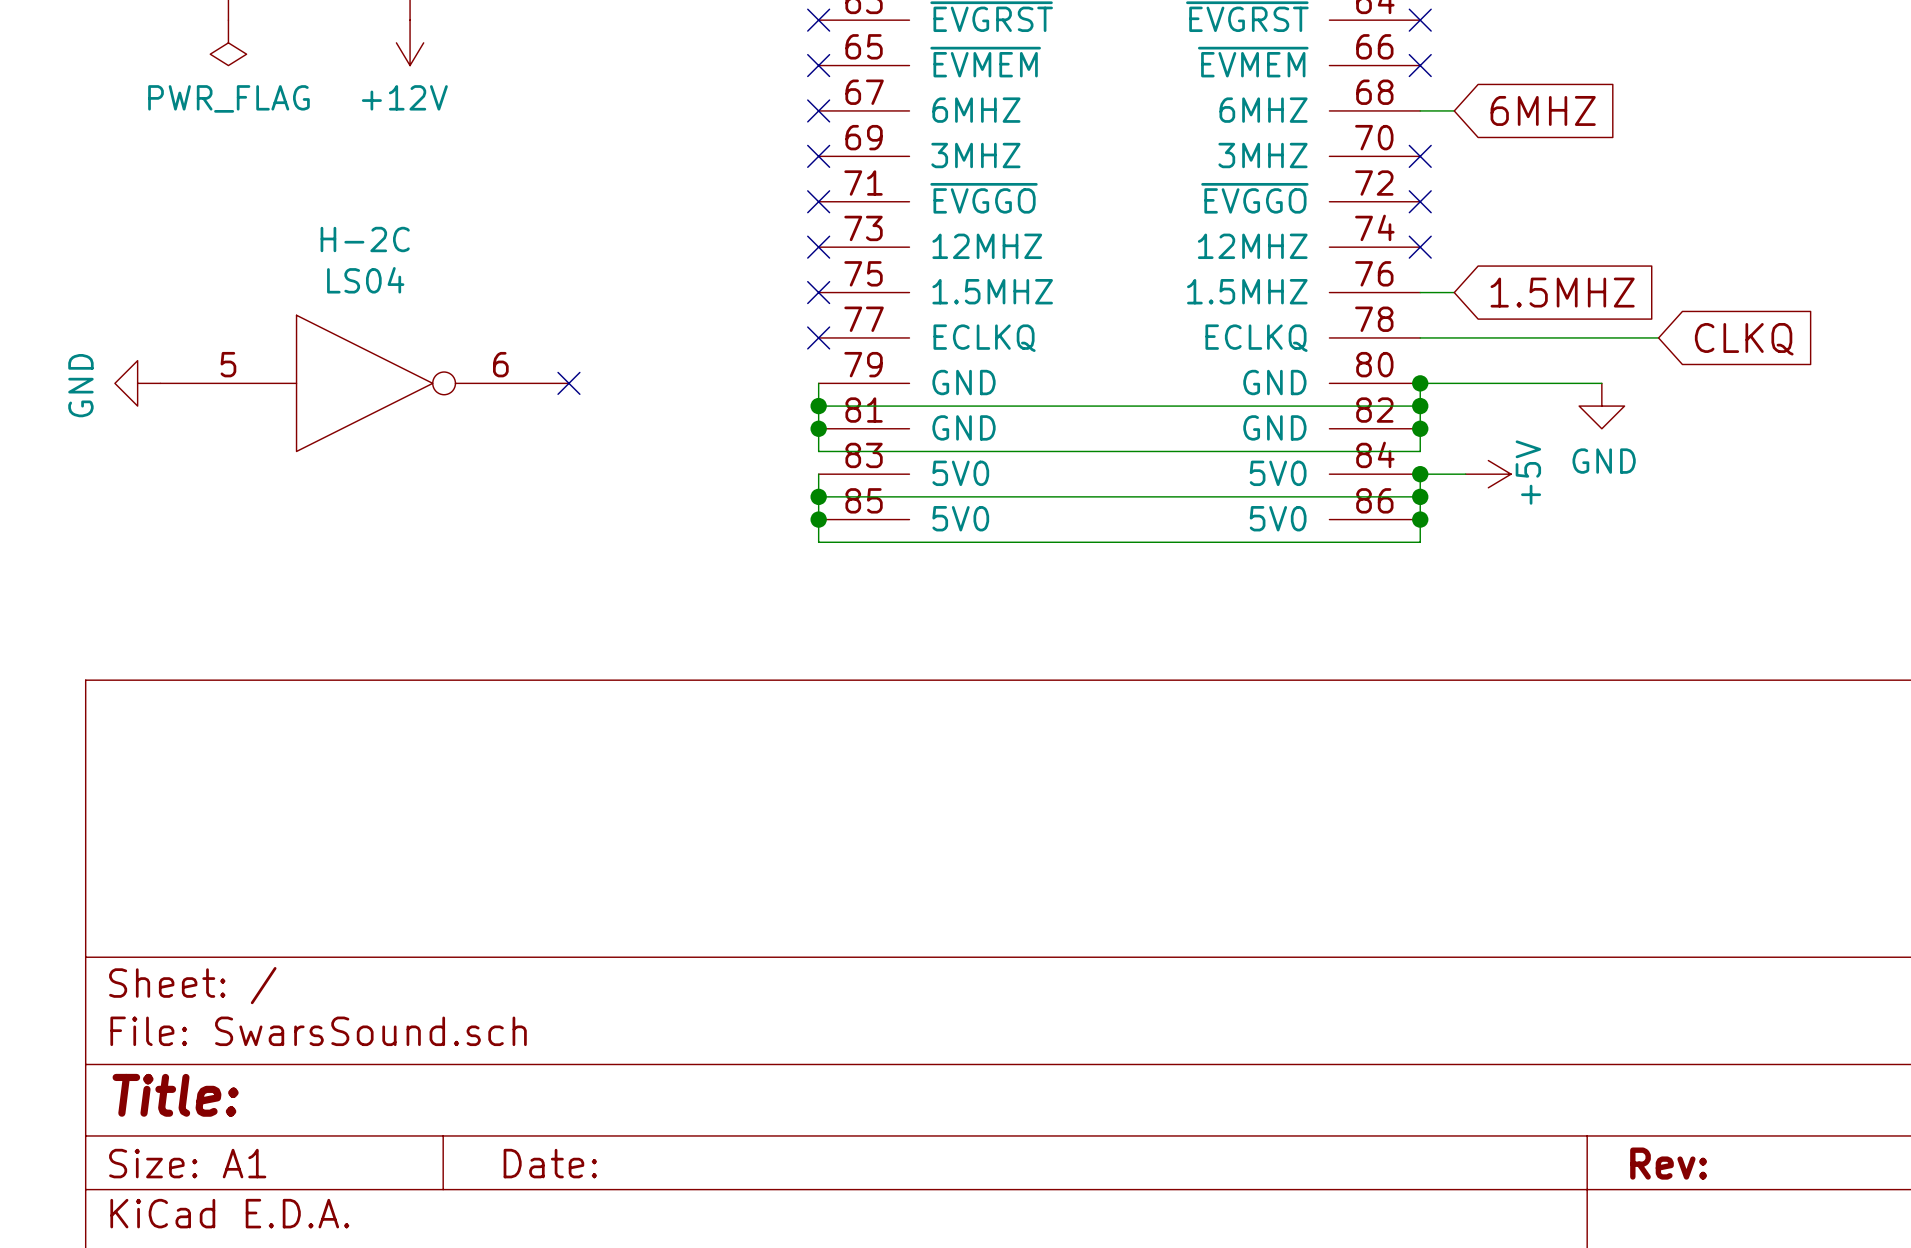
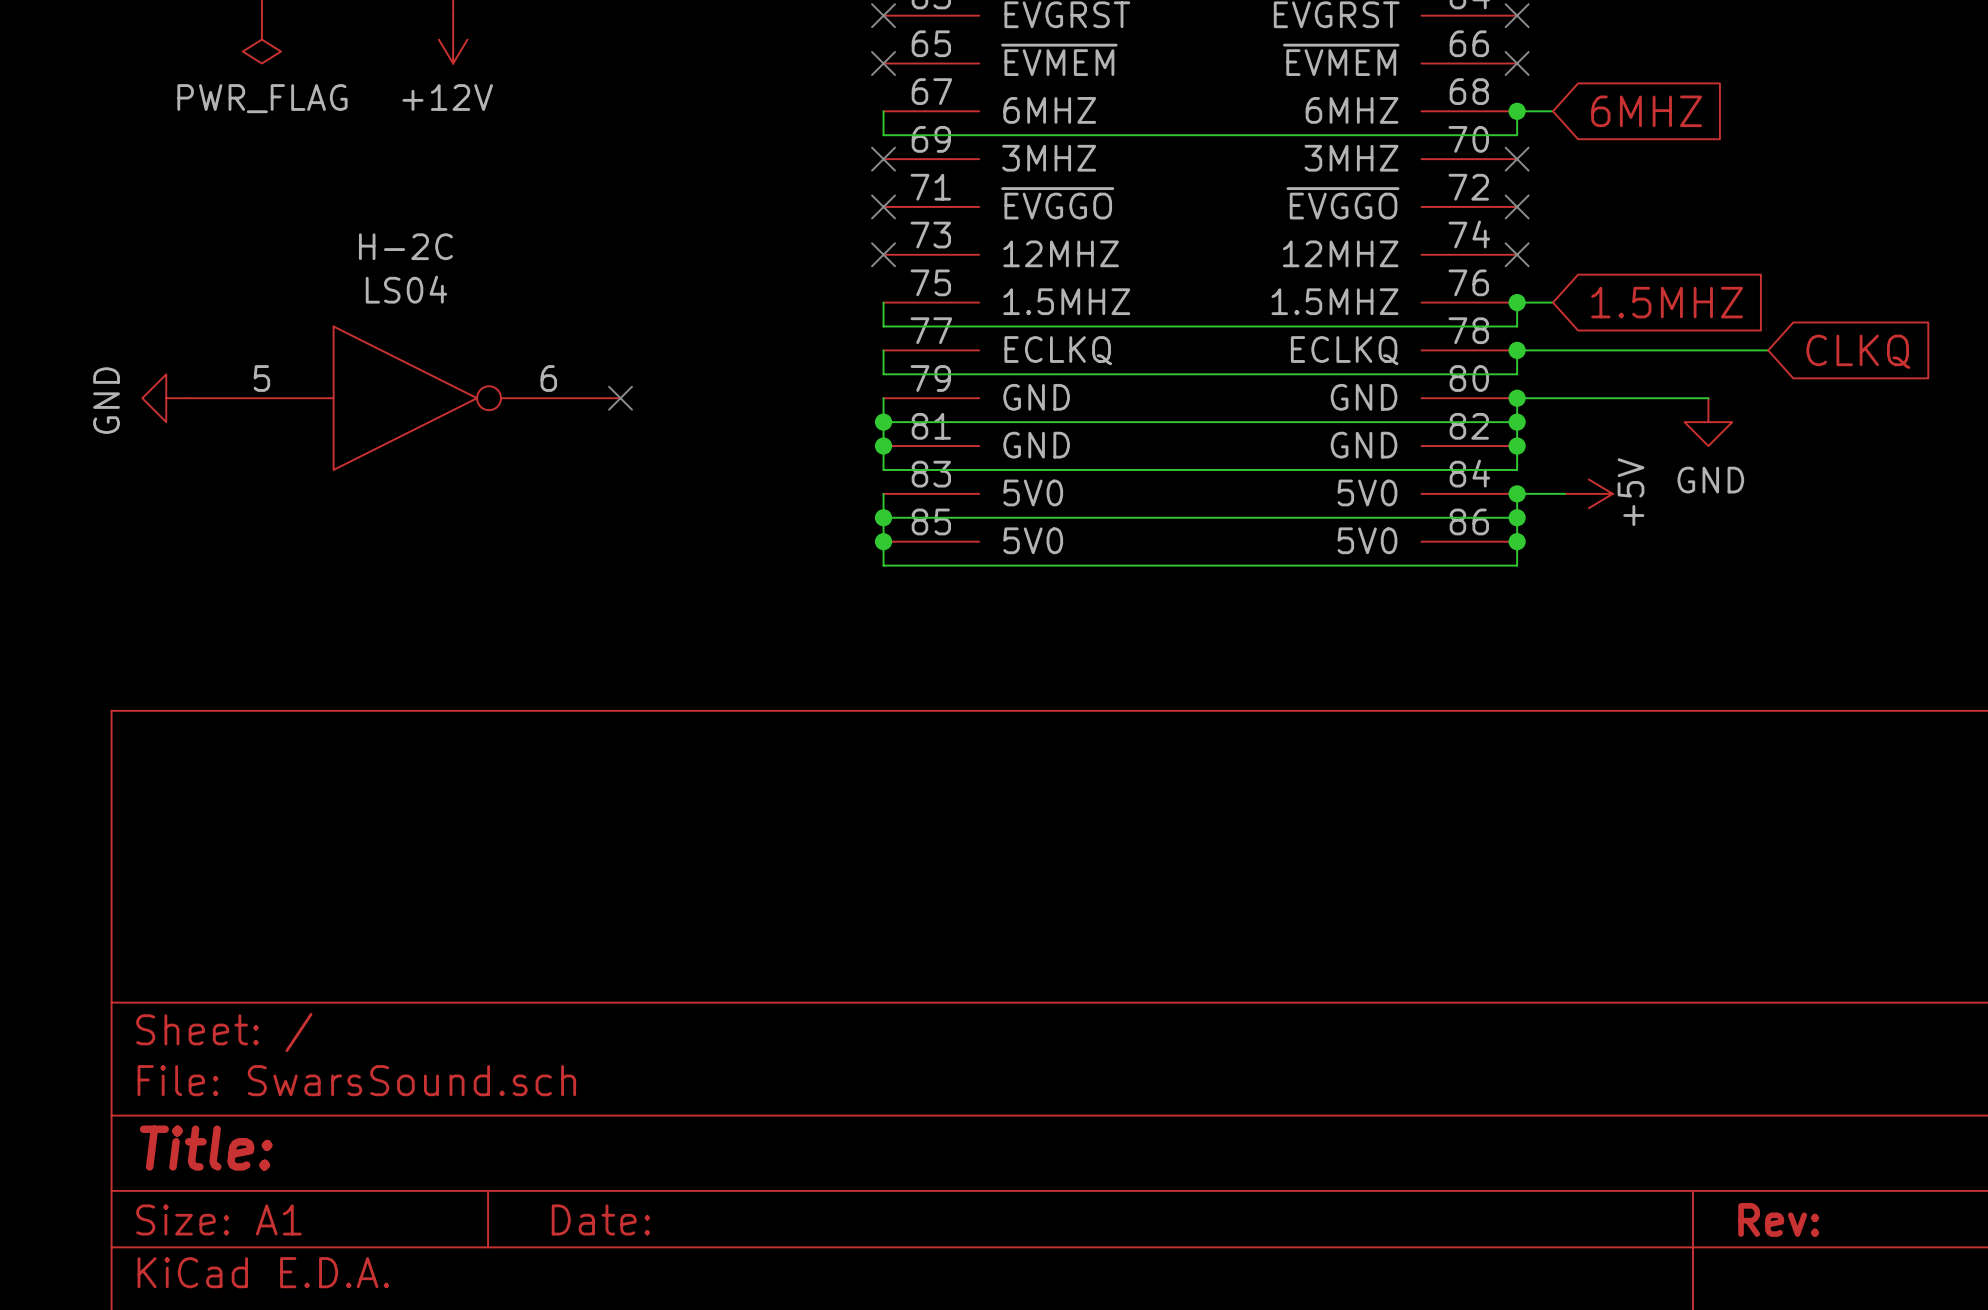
wire: none -> (883, 111) (883, 135) (1517, 135) (1517, 111)
no-connect mark: (818, 110) -> none
junction: none -> (1517, 111)
wire: none -> (883, 302) (883, 326) (1517, 326) (1517, 302)
no-connect mark: (818, 292) -> none
junction: none -> (1517, 302)
wire: none -> (883, 350) (883, 374) (1517, 374) (1517, 350)
no-connect mark: (818, 337) -> none
junction: none -> (1517, 350)

